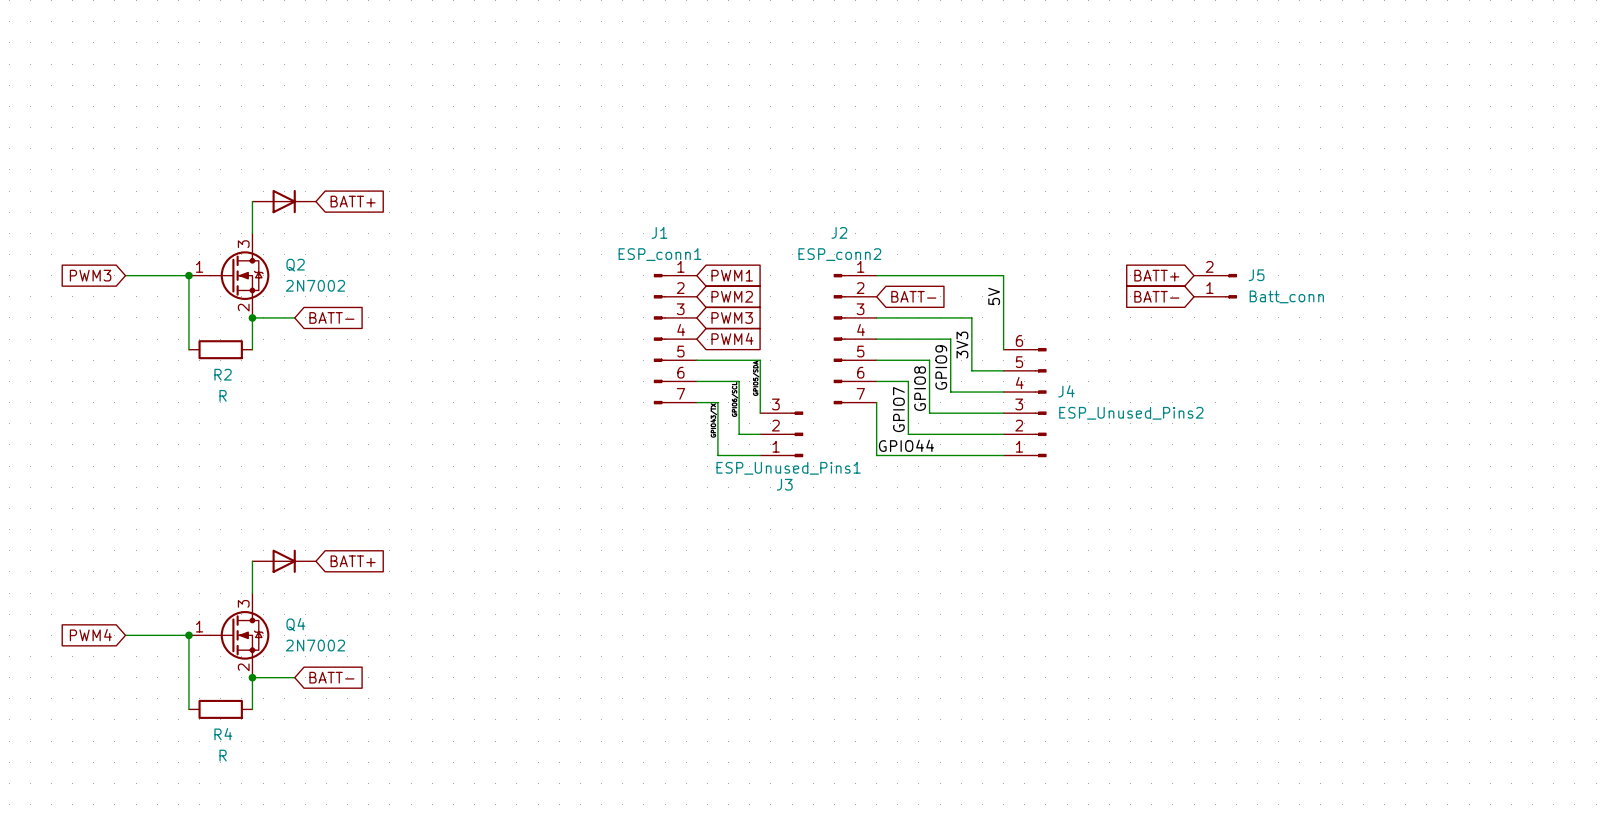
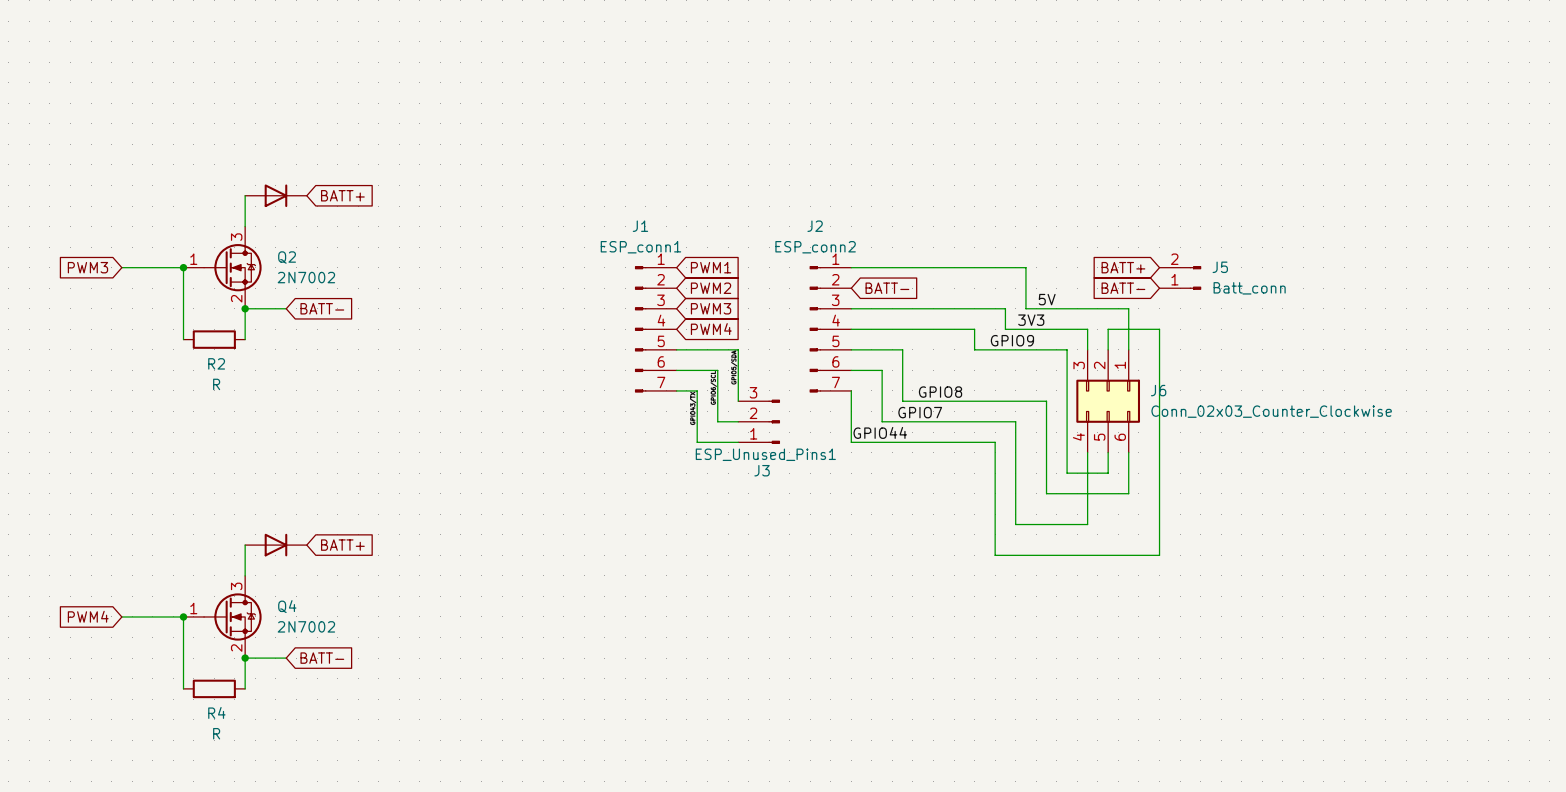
wire: (1003, 275) (1003, 339) -> (974, 267) (1025, 267) (1025, 308) (1128, 308) (1128, 349)
label rotation: 0° (994, 296) -> 90° clockwise (1047, 299)
label position: 5V (994, 296) -> 5V (1047, 299)
wire: (971, 317) (971, 370) (1003, 370) -> (943, 308) (1005, 308) (1005, 329) (1087, 329) (1087, 349)
wire: (950, 339) (950, 392) (1003, 392) -> (923, 329) (974, 329)
label rotation: 0° (962, 345) -> 90° clockwise (1031, 320)
label position: 3V3 (962, 345) -> 3V3 (1031, 320)
wire: none -> (974, 339) (974, 349) (1067, 349) (1067, 473) (1108, 473) (1108, 452)
wire: none -> (1108, 349) (1108, 329) (1159, 329) (1159, 555) (995, 555) (995, 442) (974, 442)
label rotation: 0° (941, 367) -> 90° clockwise (1012, 340)
label position: GPIO9 (941, 367) -> GPIO9 (1012, 340)
label rotation: 0° (920, 388) -> 90° clockwise (940, 392)
J4: ESP_Unused_Pins2 (1025, 402) -> none
label rotation: 0° (898, 409) -> 90° clockwise (920, 412)
wire: none -> (974, 401) (1046, 401) (1046, 493) (1128, 493) (1128, 452)
J6: none -> Conn_02x03_Counter_Clockwise (1108, 401)
wire: none -> (974, 421) (1015, 421) (1015, 524) (1087, 524) (1087, 452)

